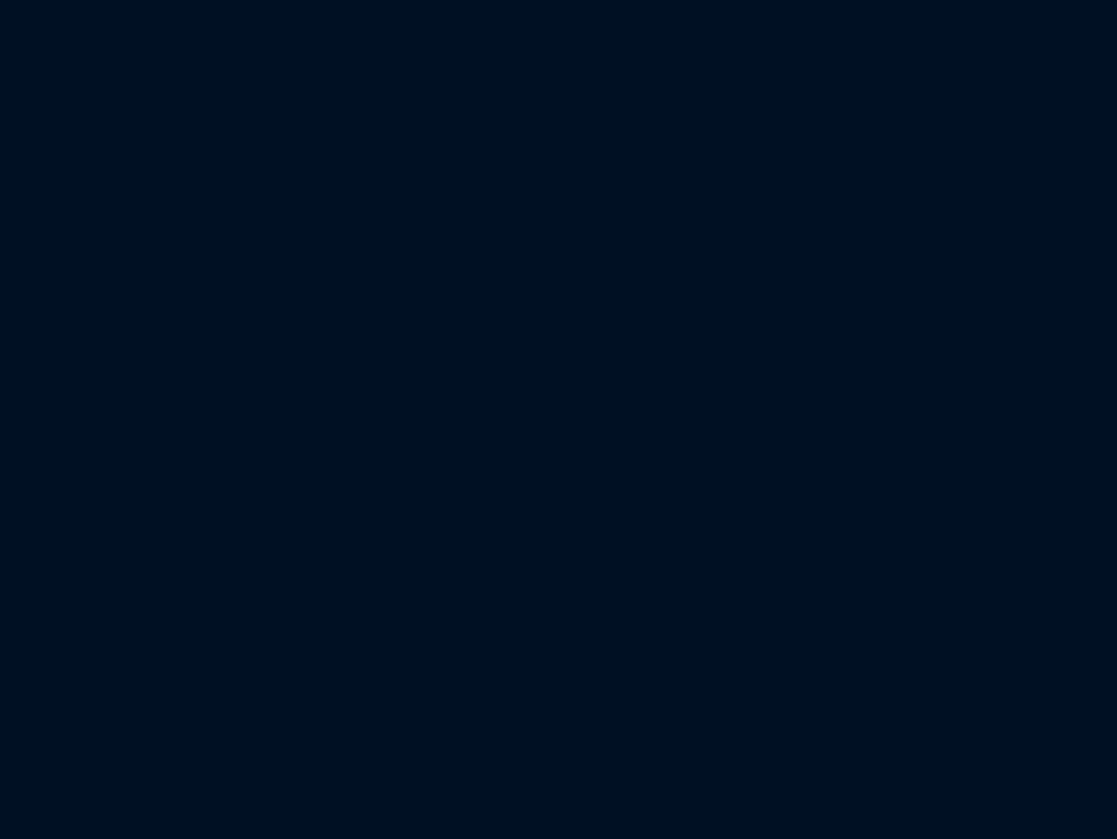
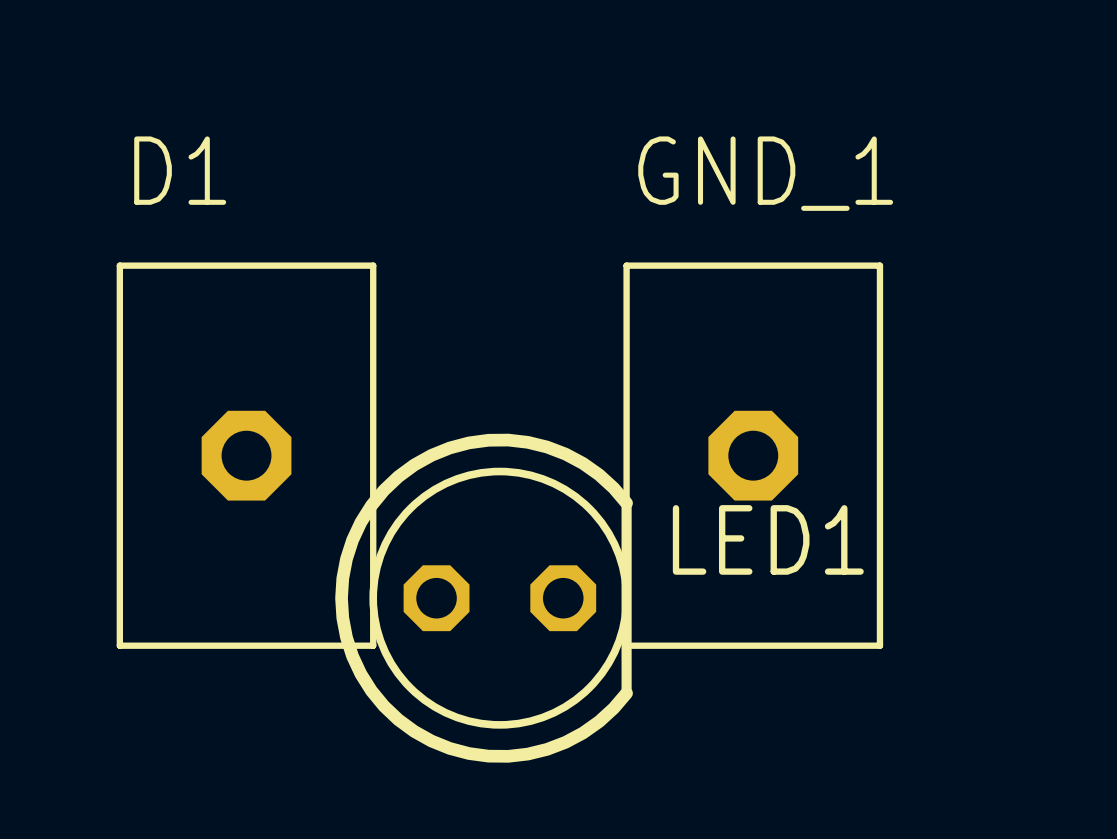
D1: none -> (246, 455)
GND_1: none -> (753, 455)
LED1: none -> (484, 598)

